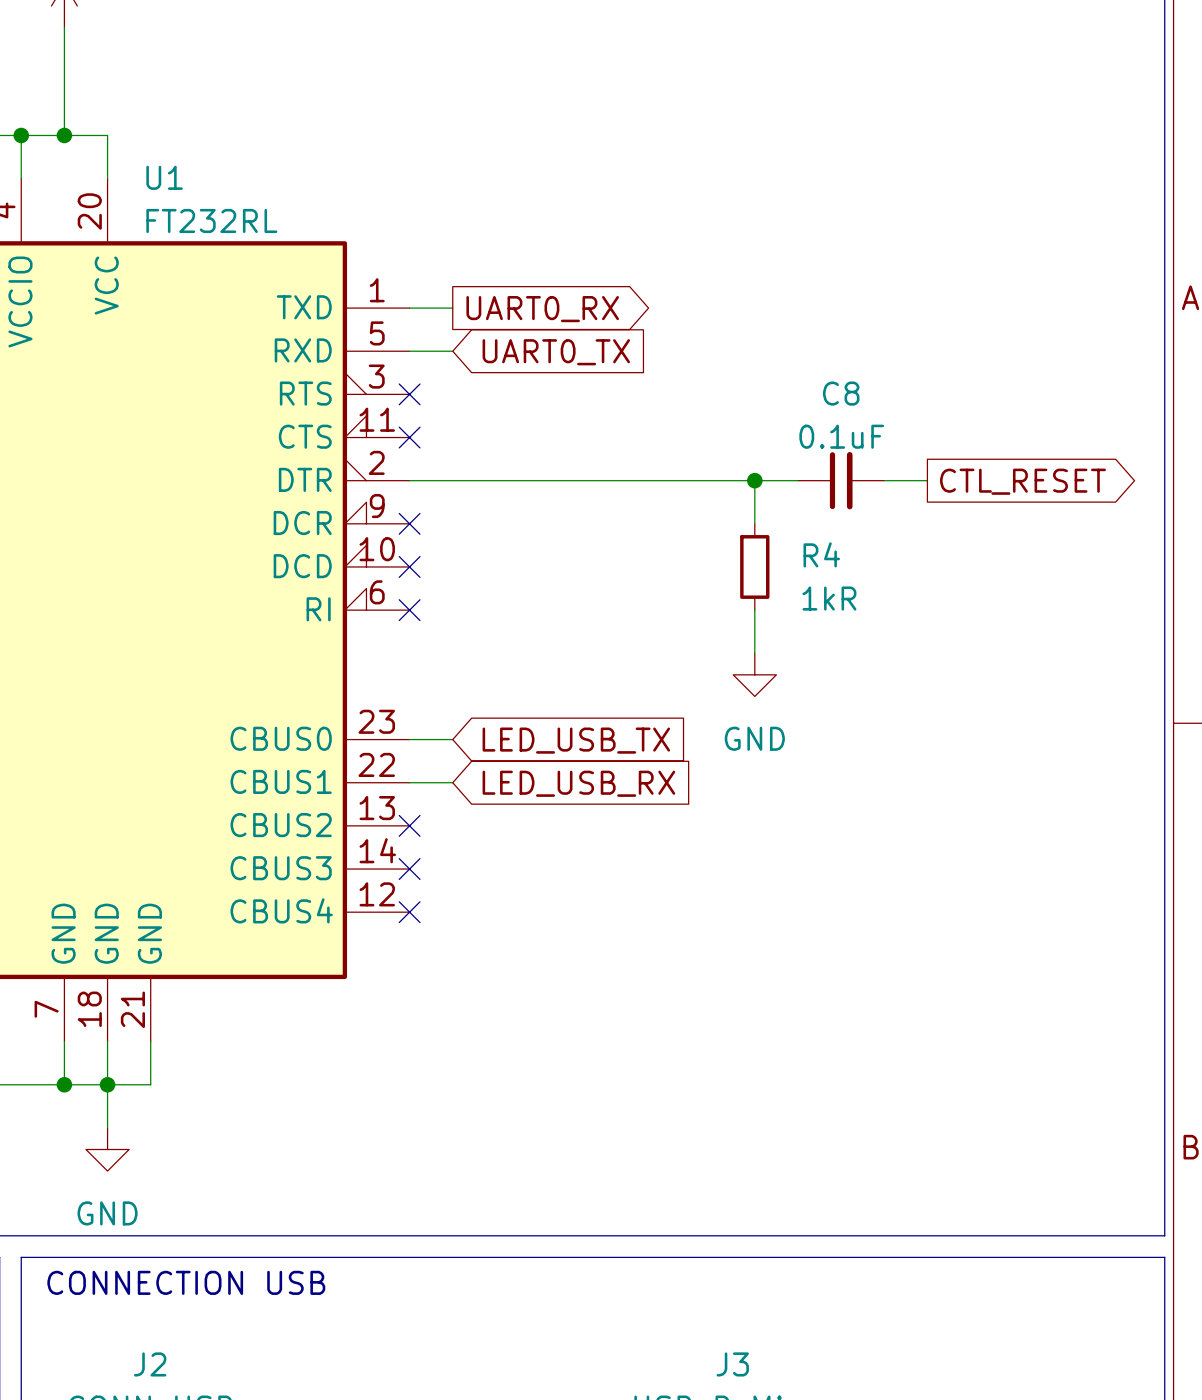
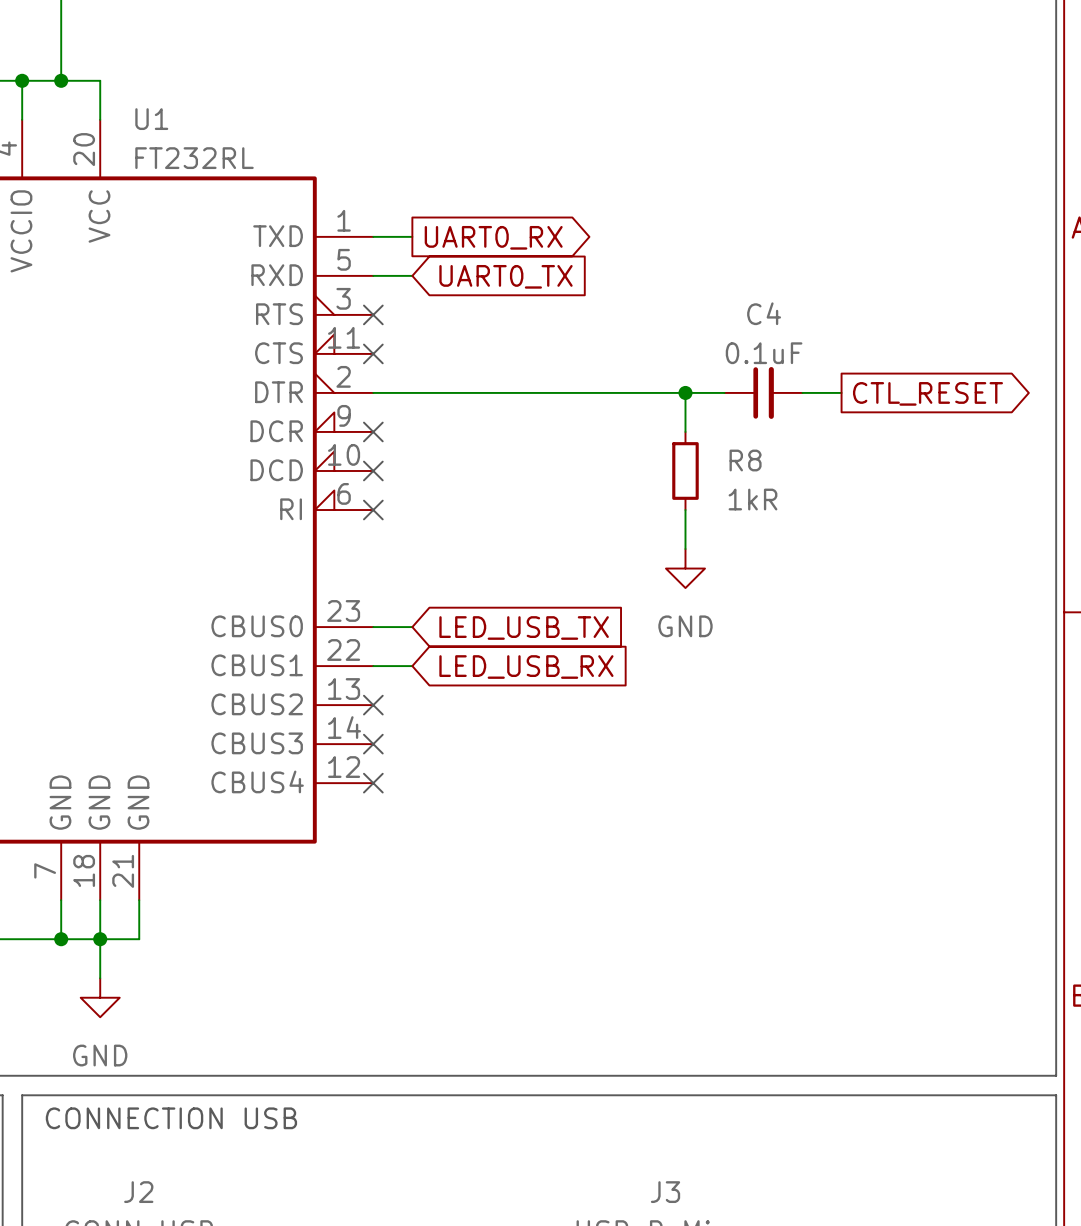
C8 name: C8 (841, 393) -> C4 (764, 313)
R4 name: R4 (821, 554) -> R8 (745, 460)

